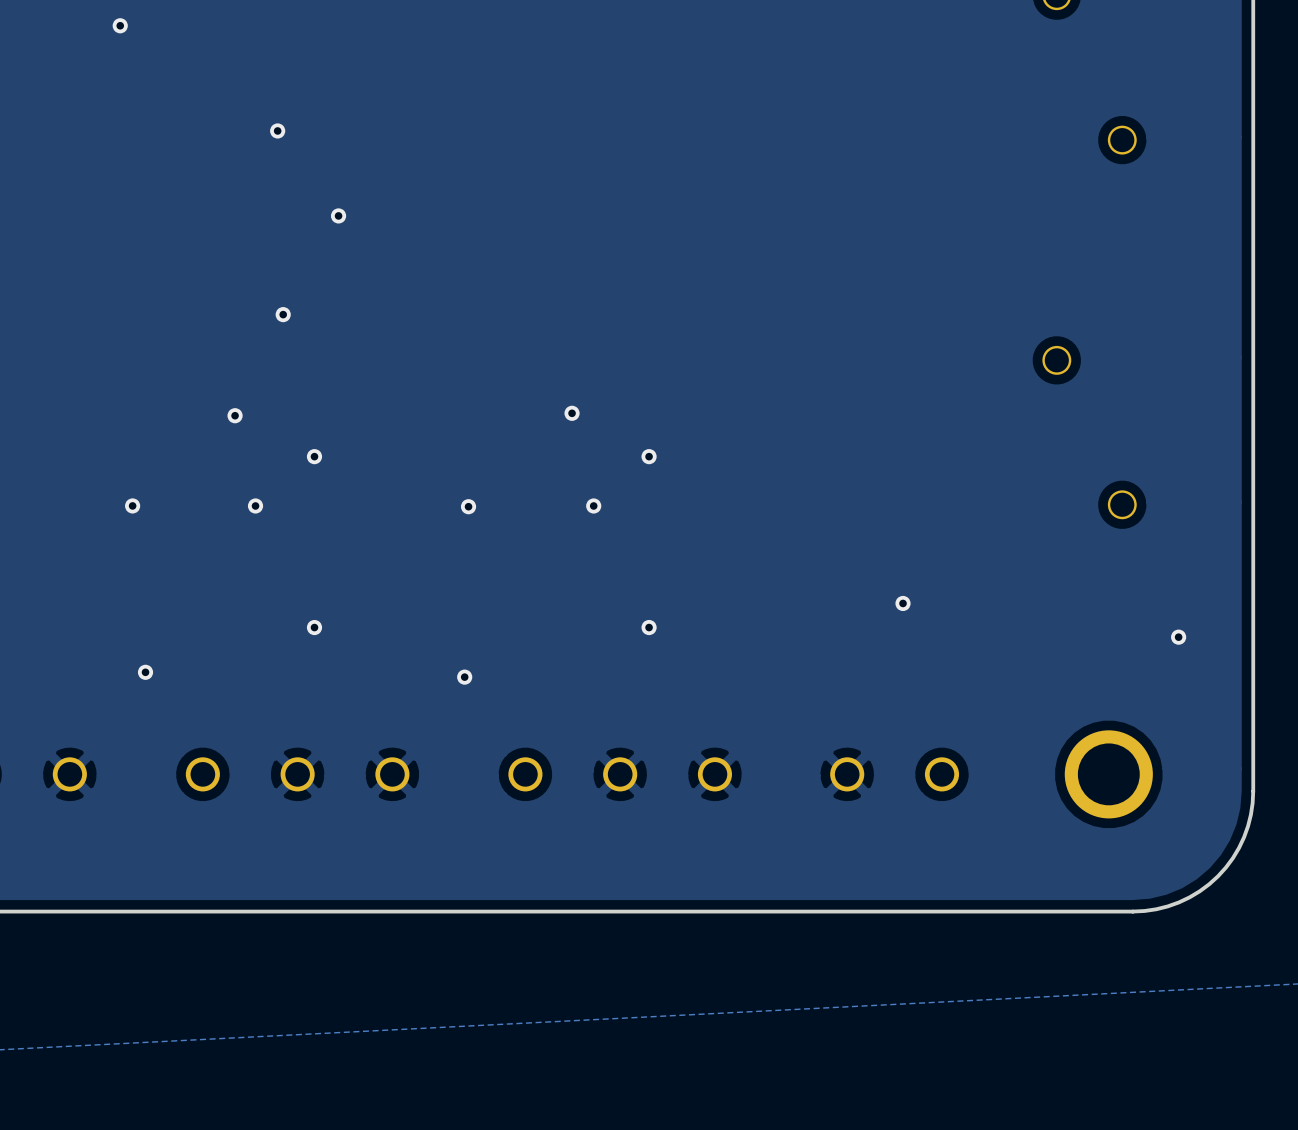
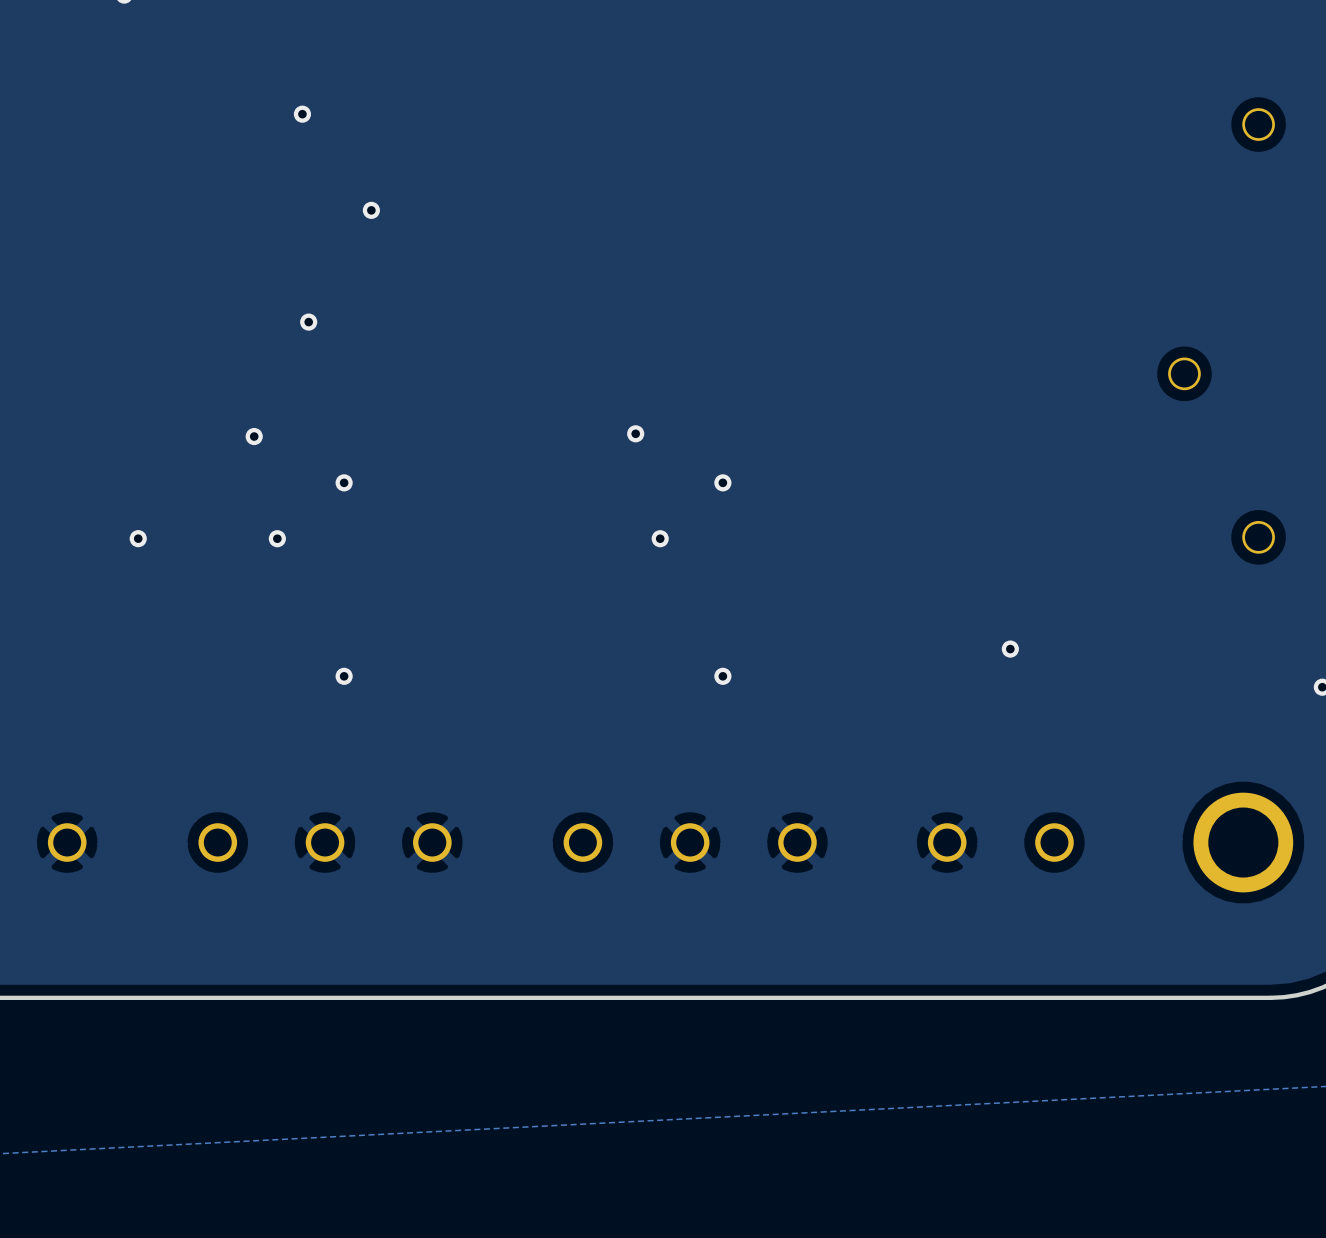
via: (468, 506) -> none
via: (145, 672) -> none
via: (464, 677) -> none

